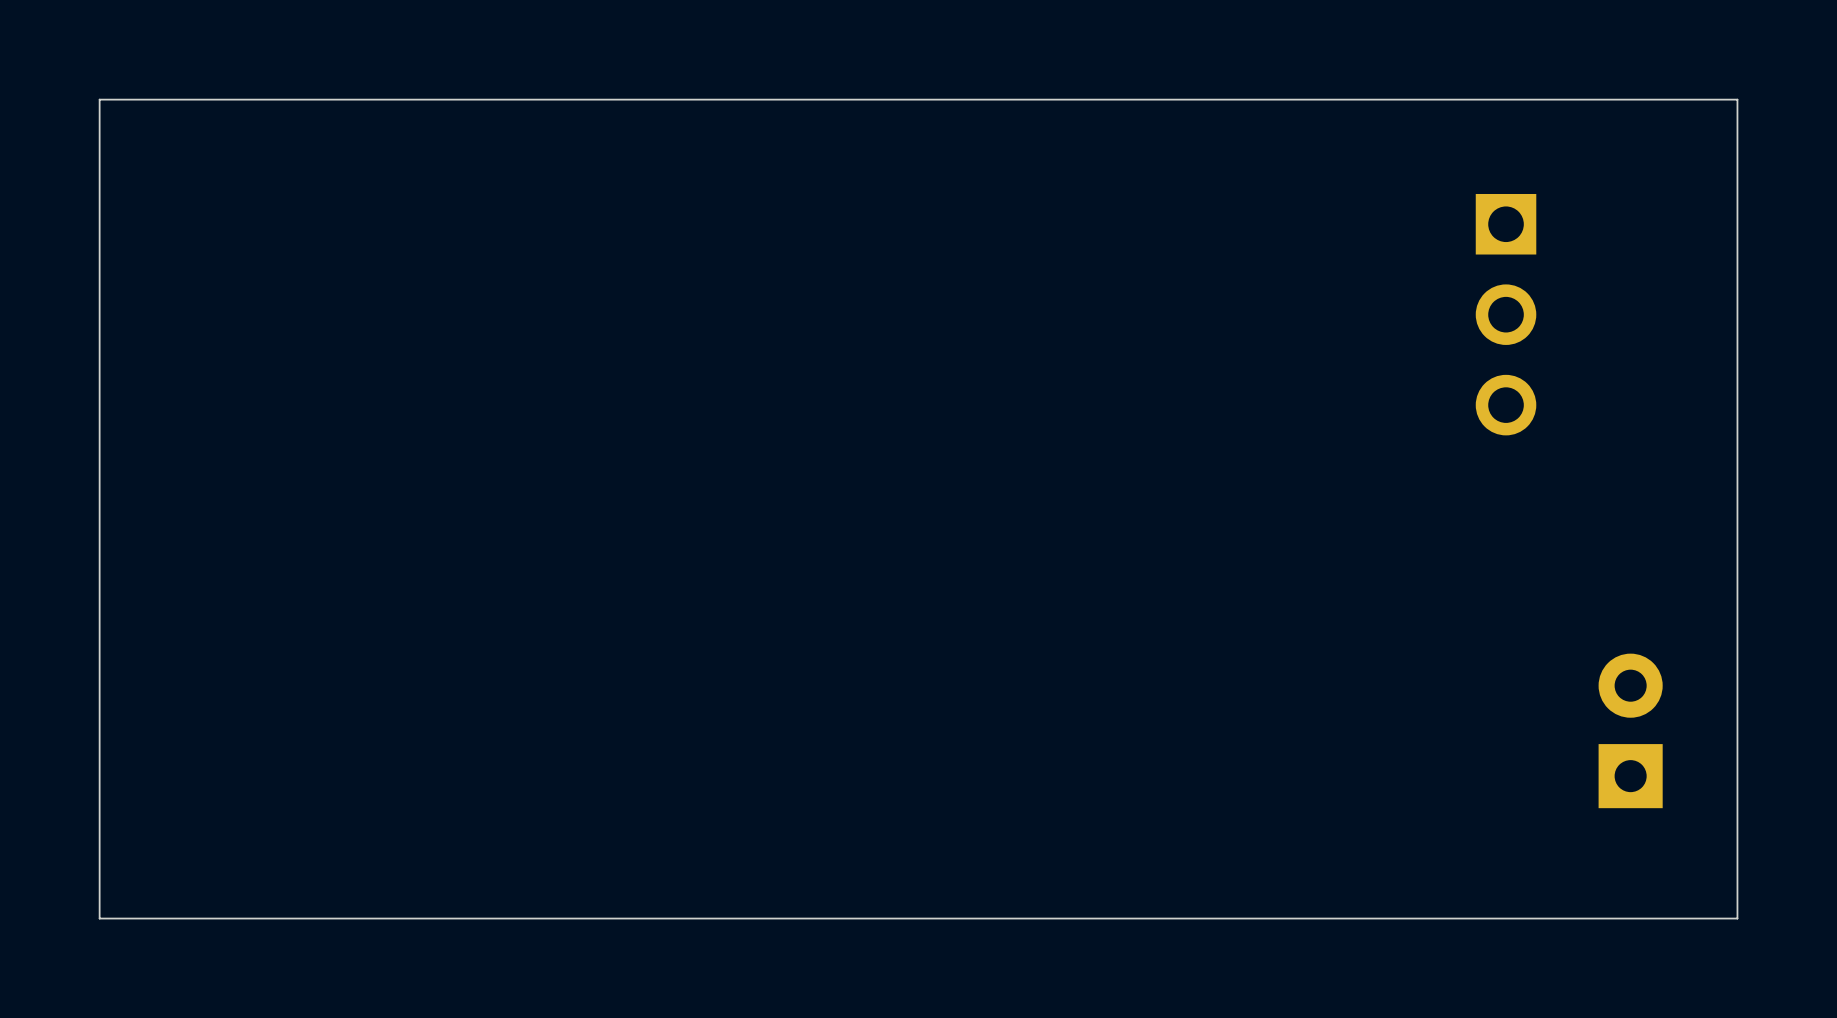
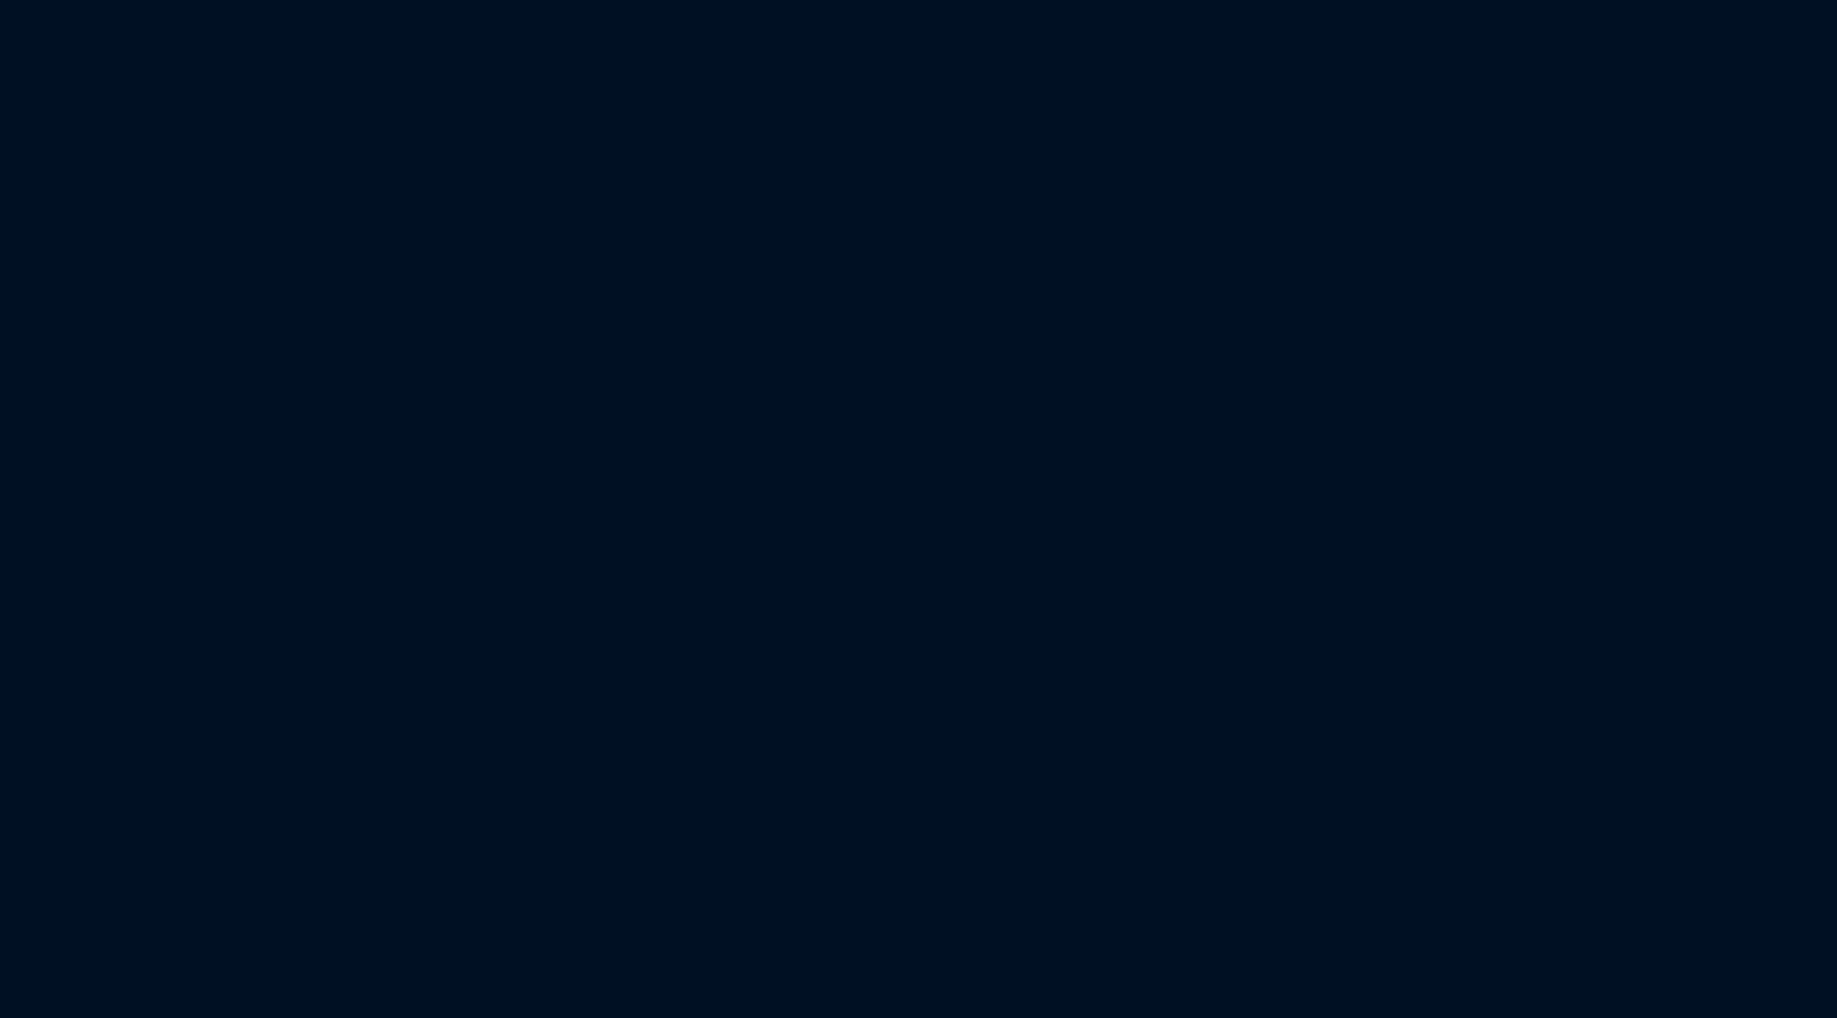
board edge: (1737, 99) (99, 99) (99, 918) (1737, 918) (1737, 99) -> none
part: (1506, 314) -> none
part: (1630, 730) -> none

